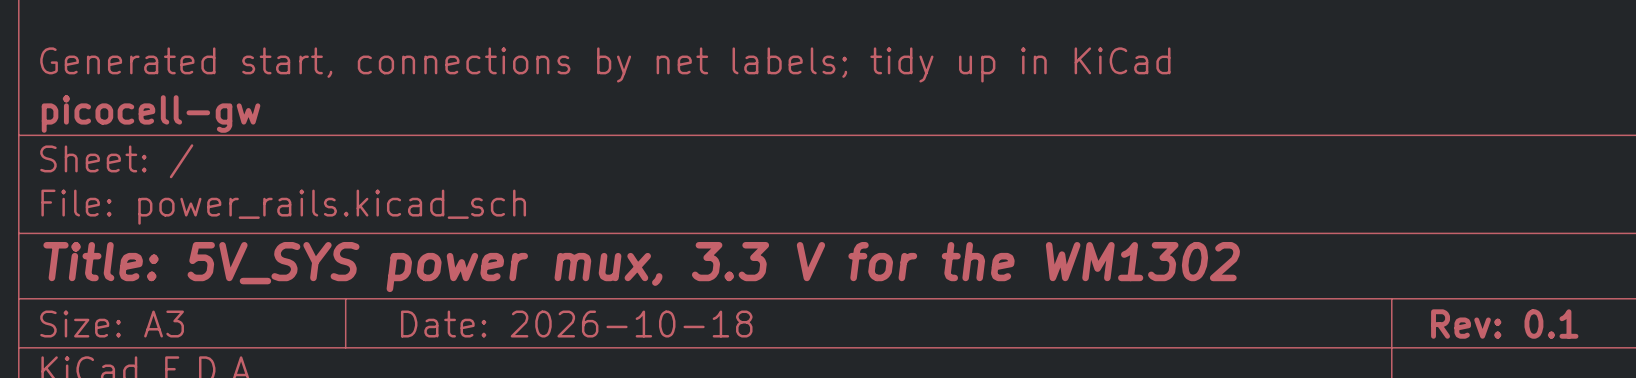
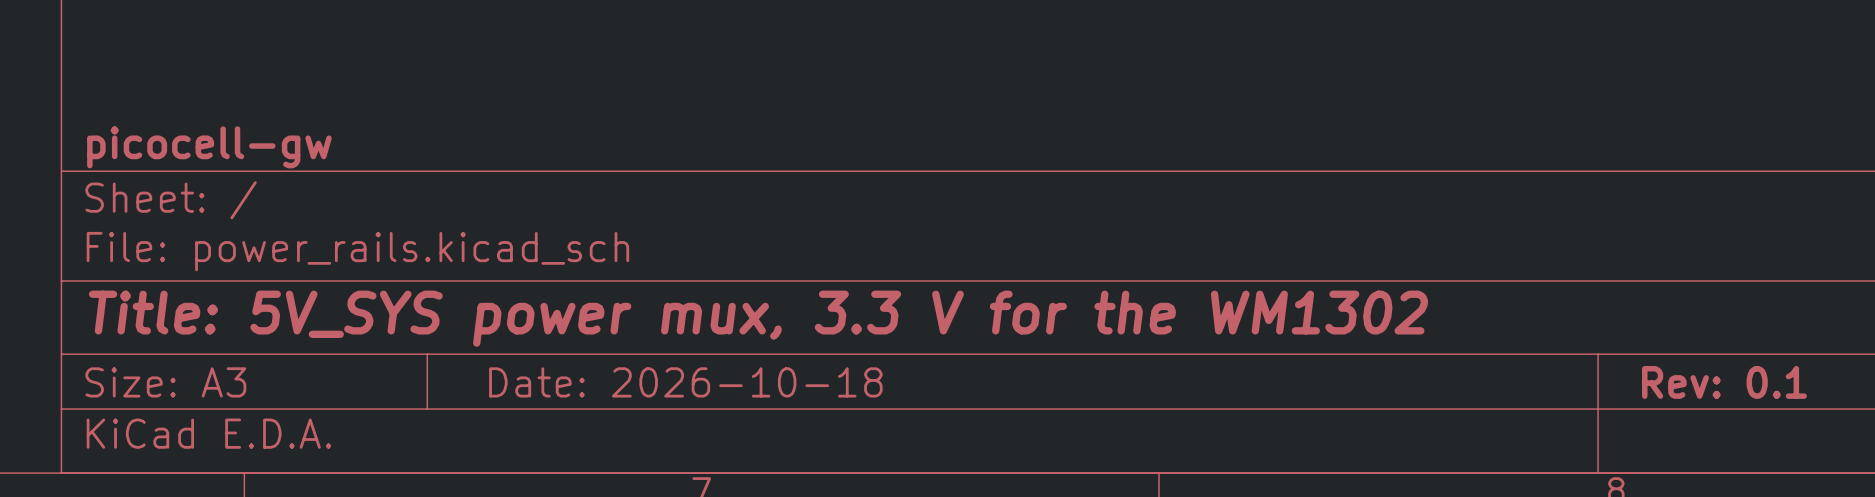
title block: Generated start, connections by net labels; tidy up in KiCad (605, 64) -> none

